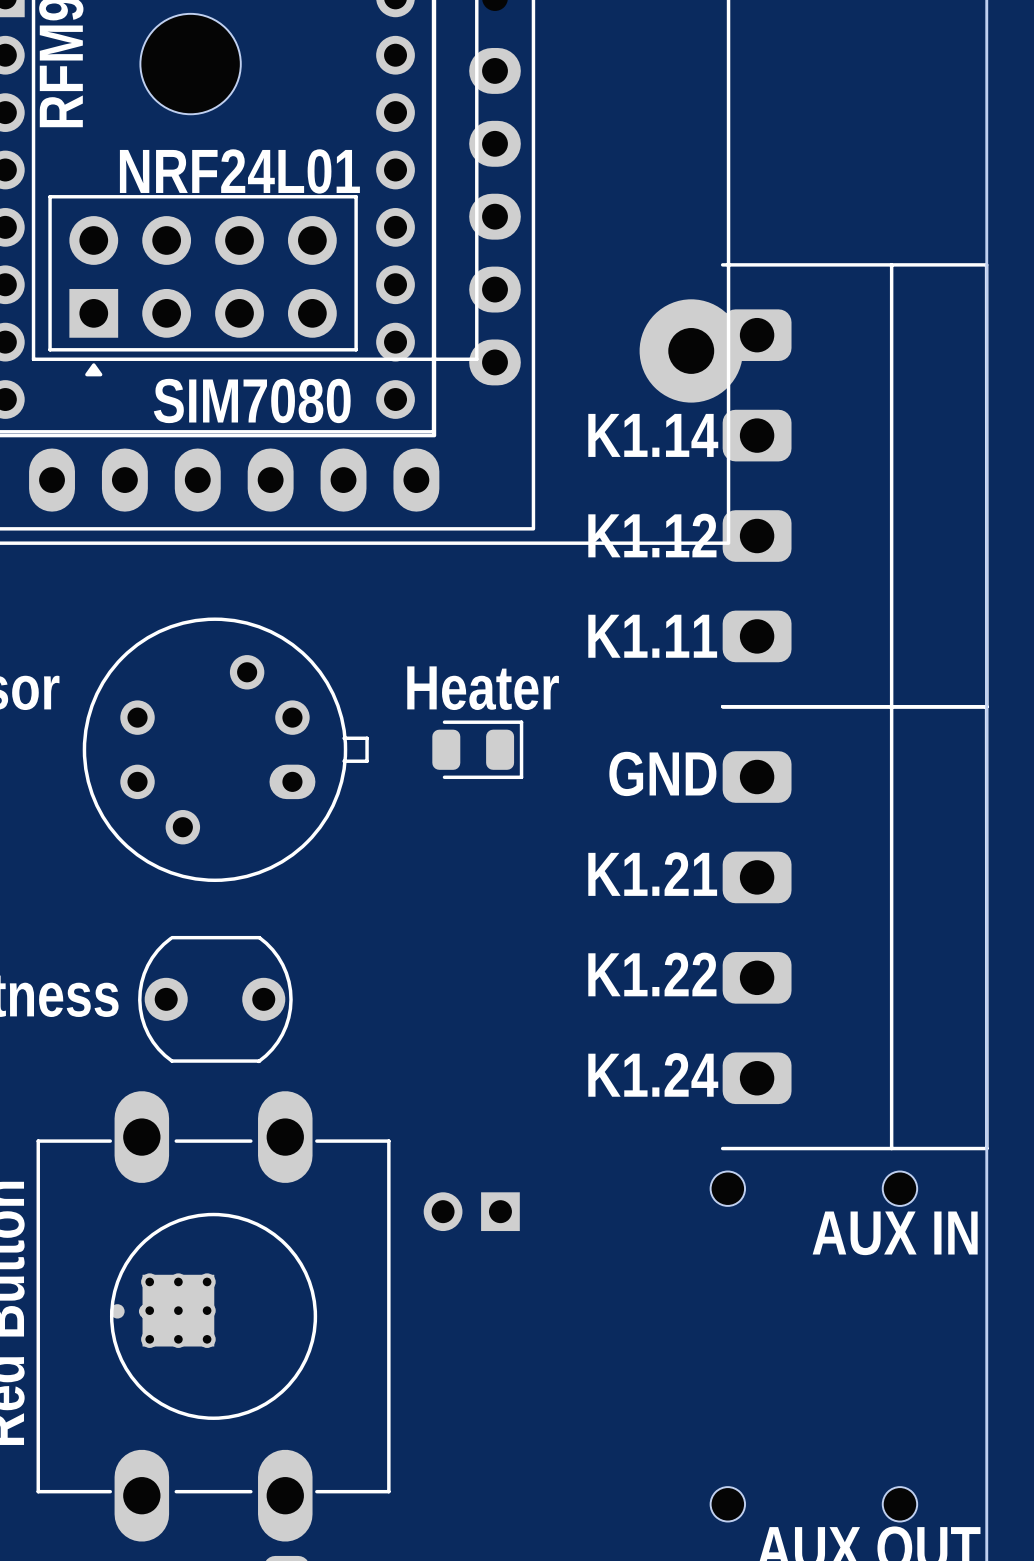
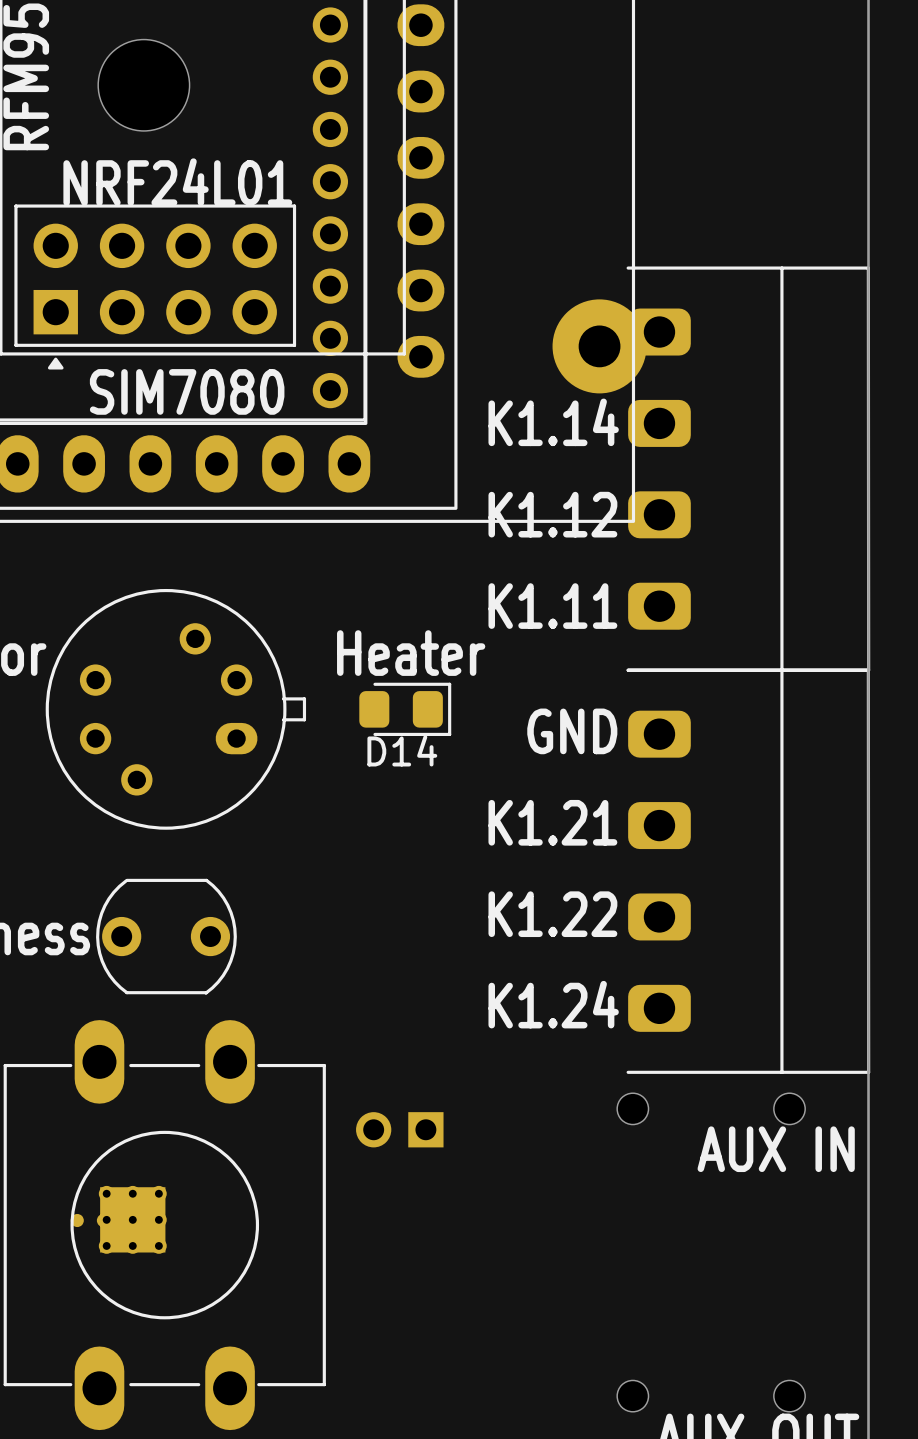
part: (477, 749) -> none
D14: none -> (405, 709)

